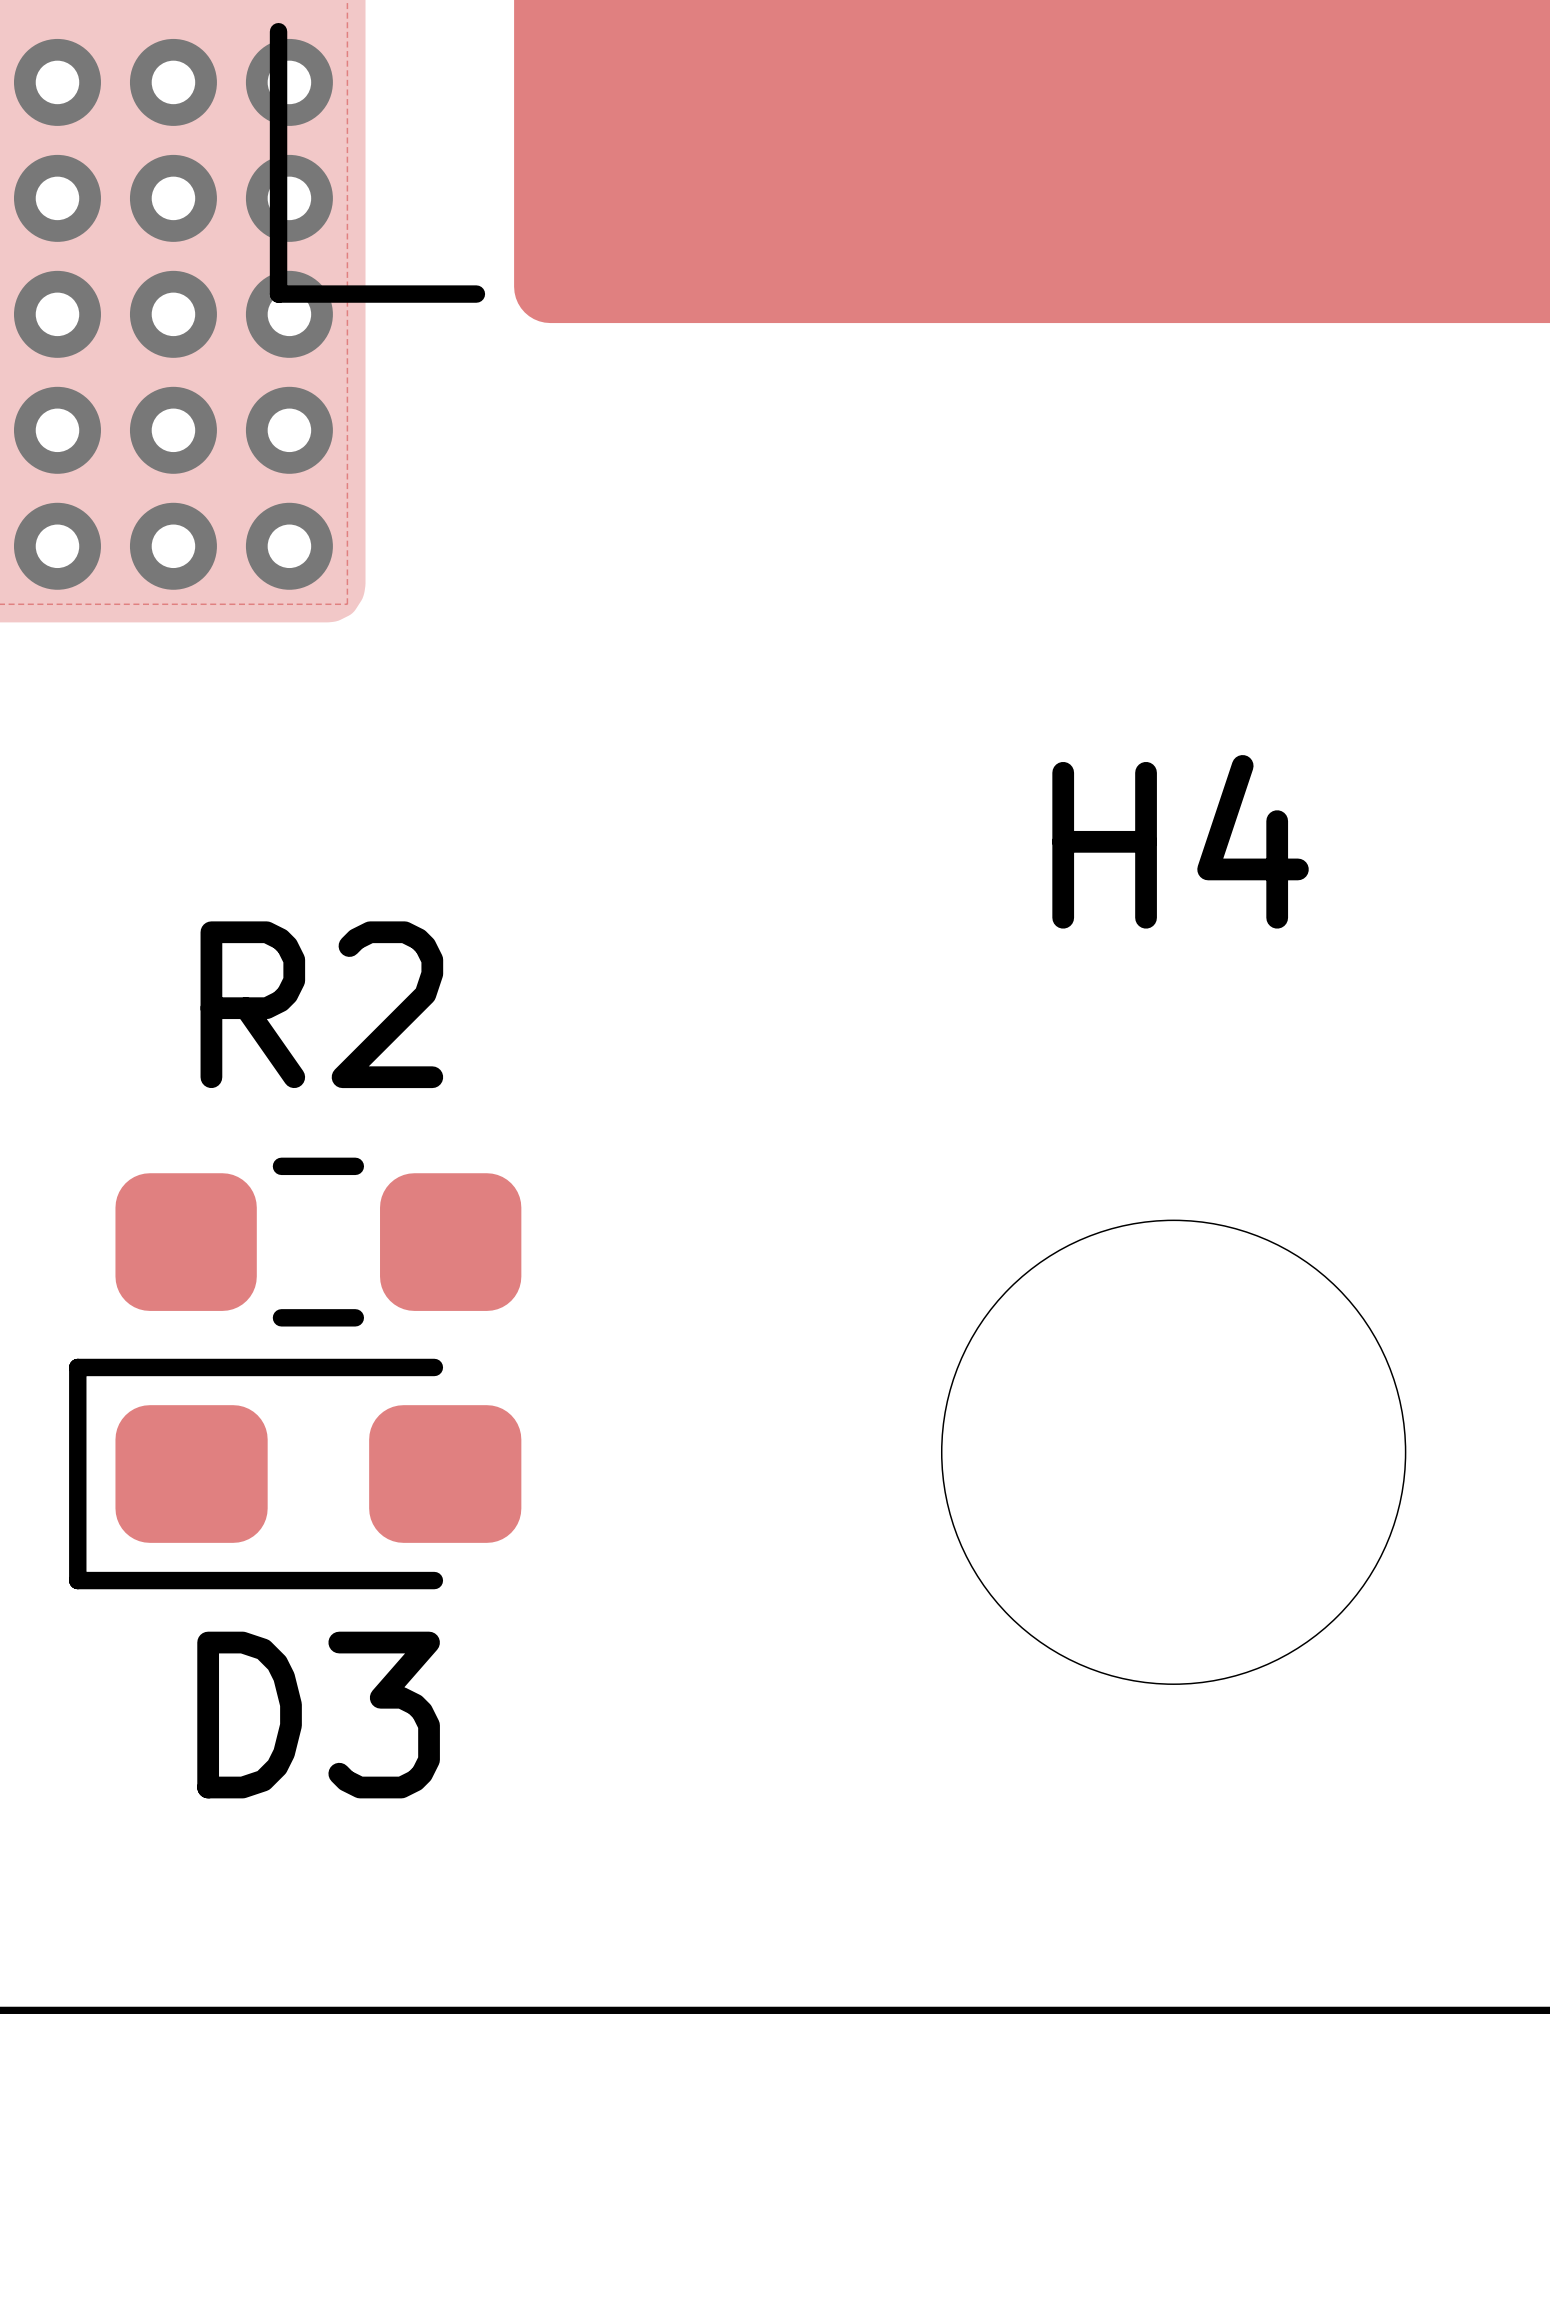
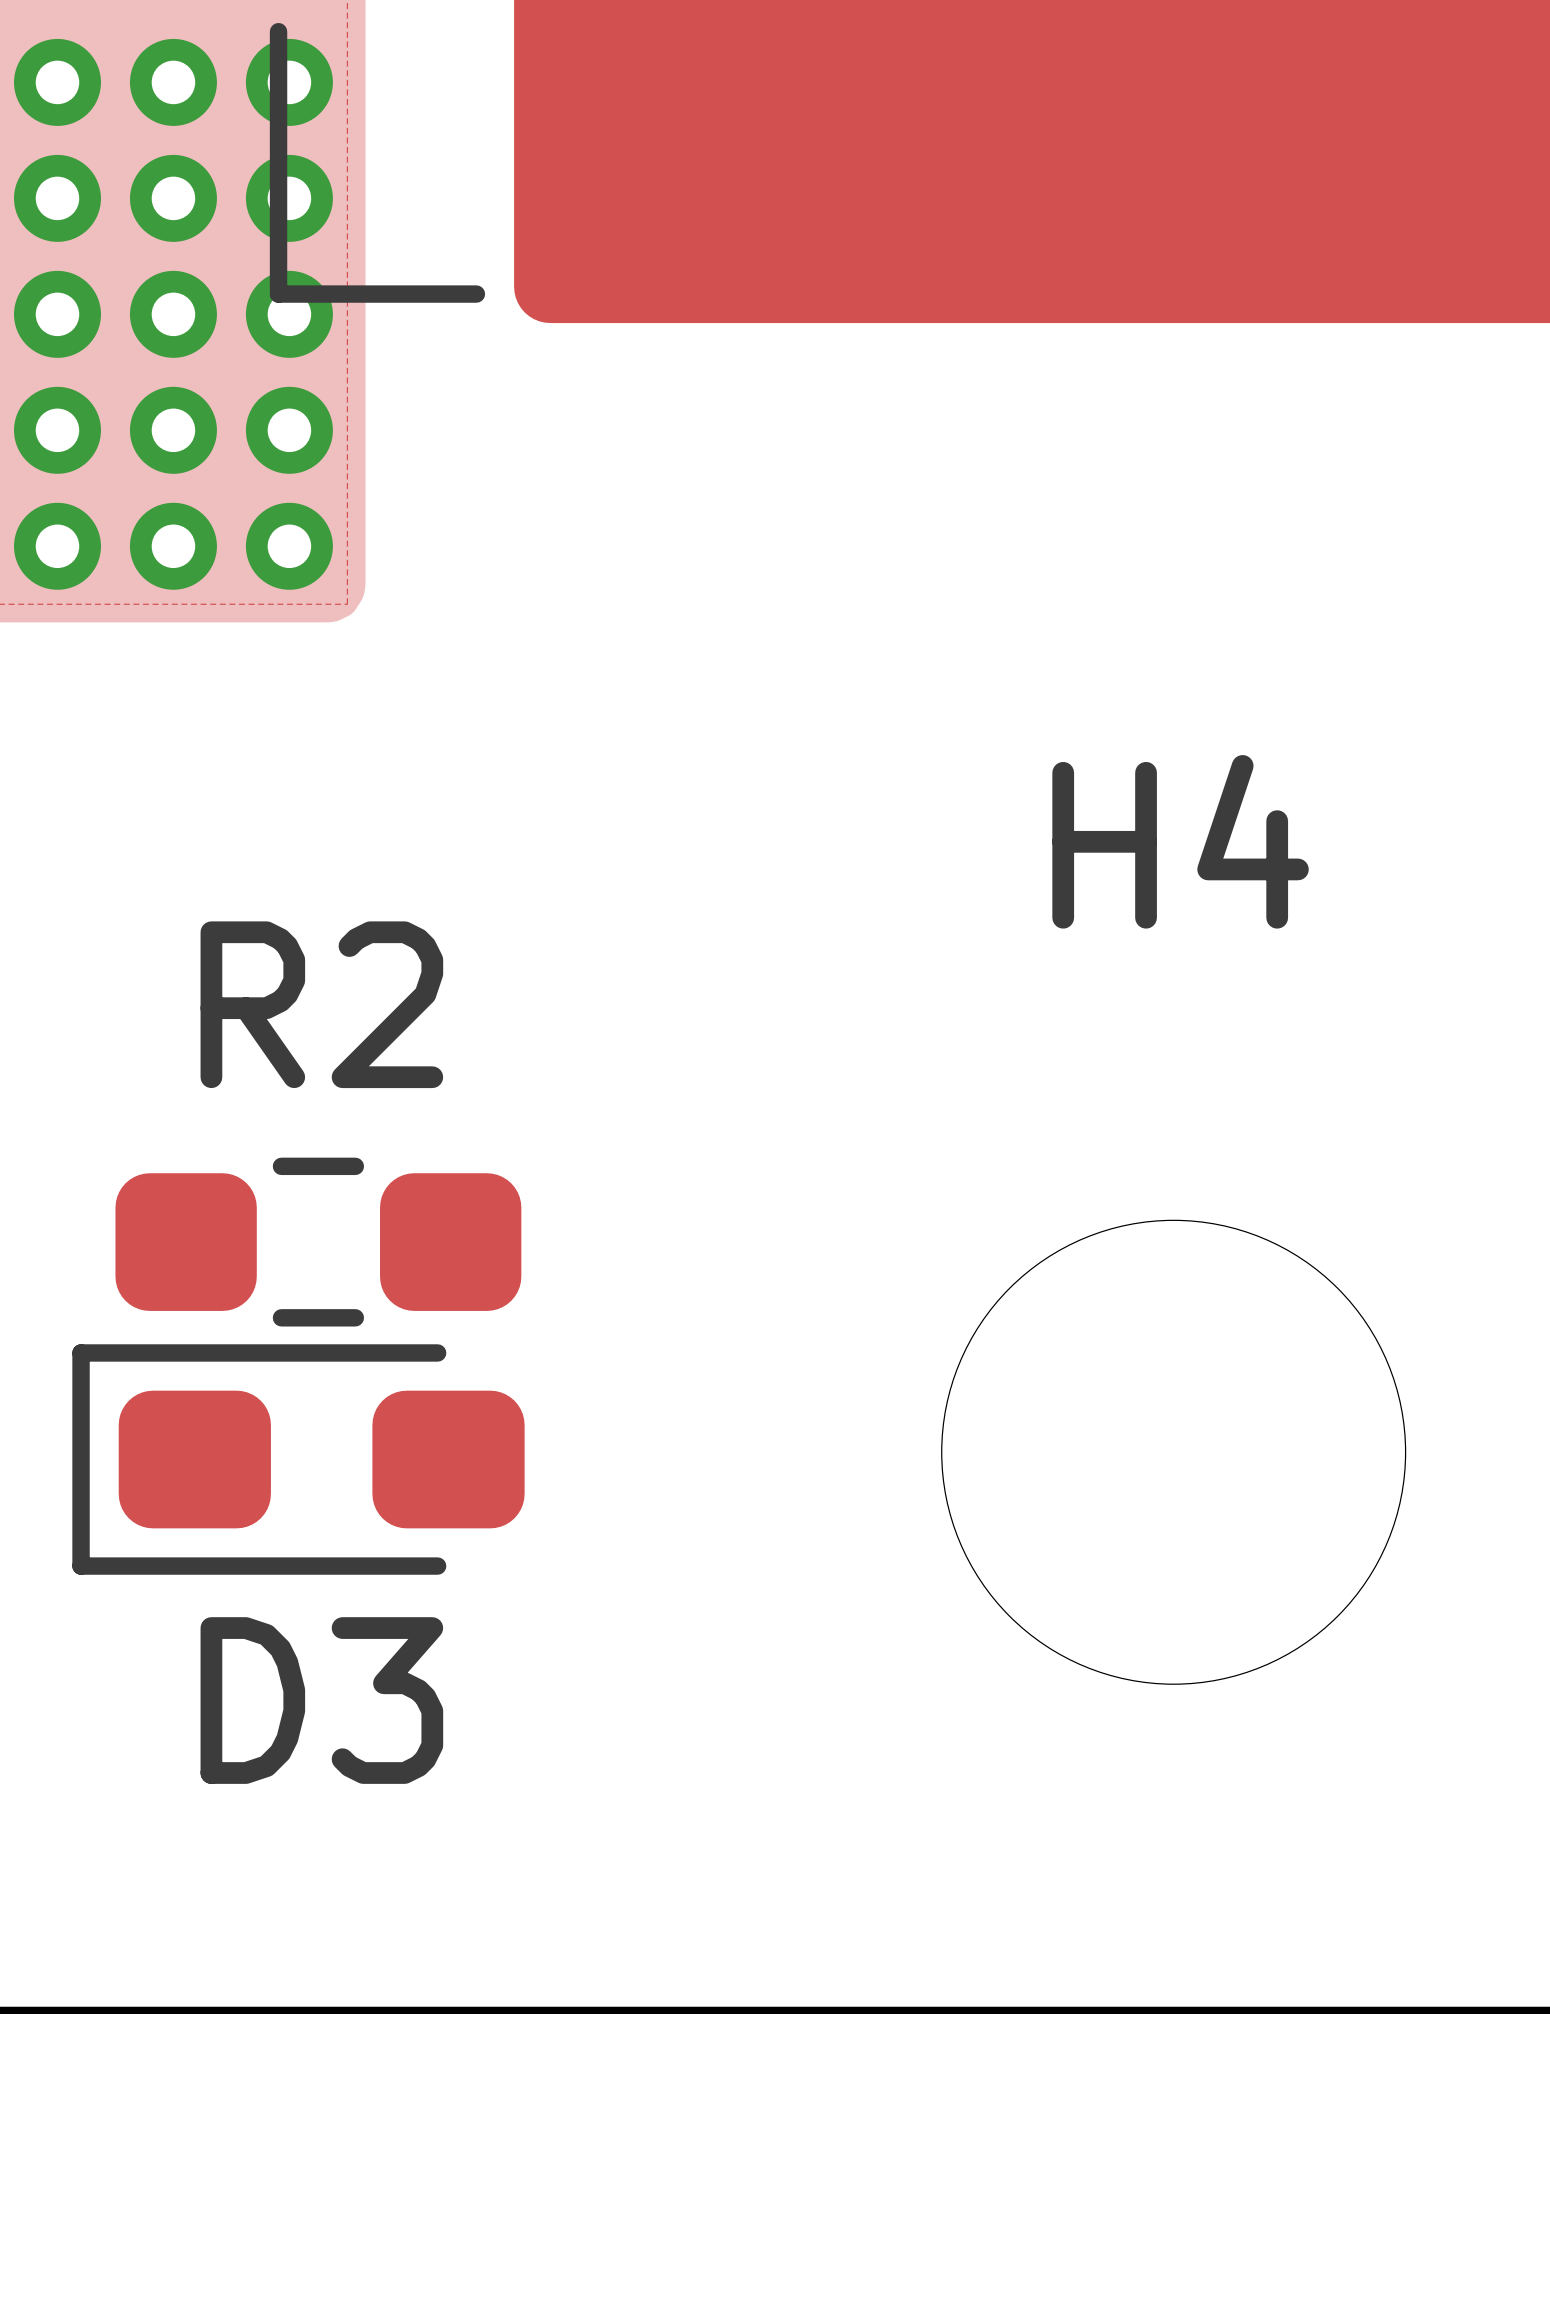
D3 position: (295, 1474) -> (298, 1459)

